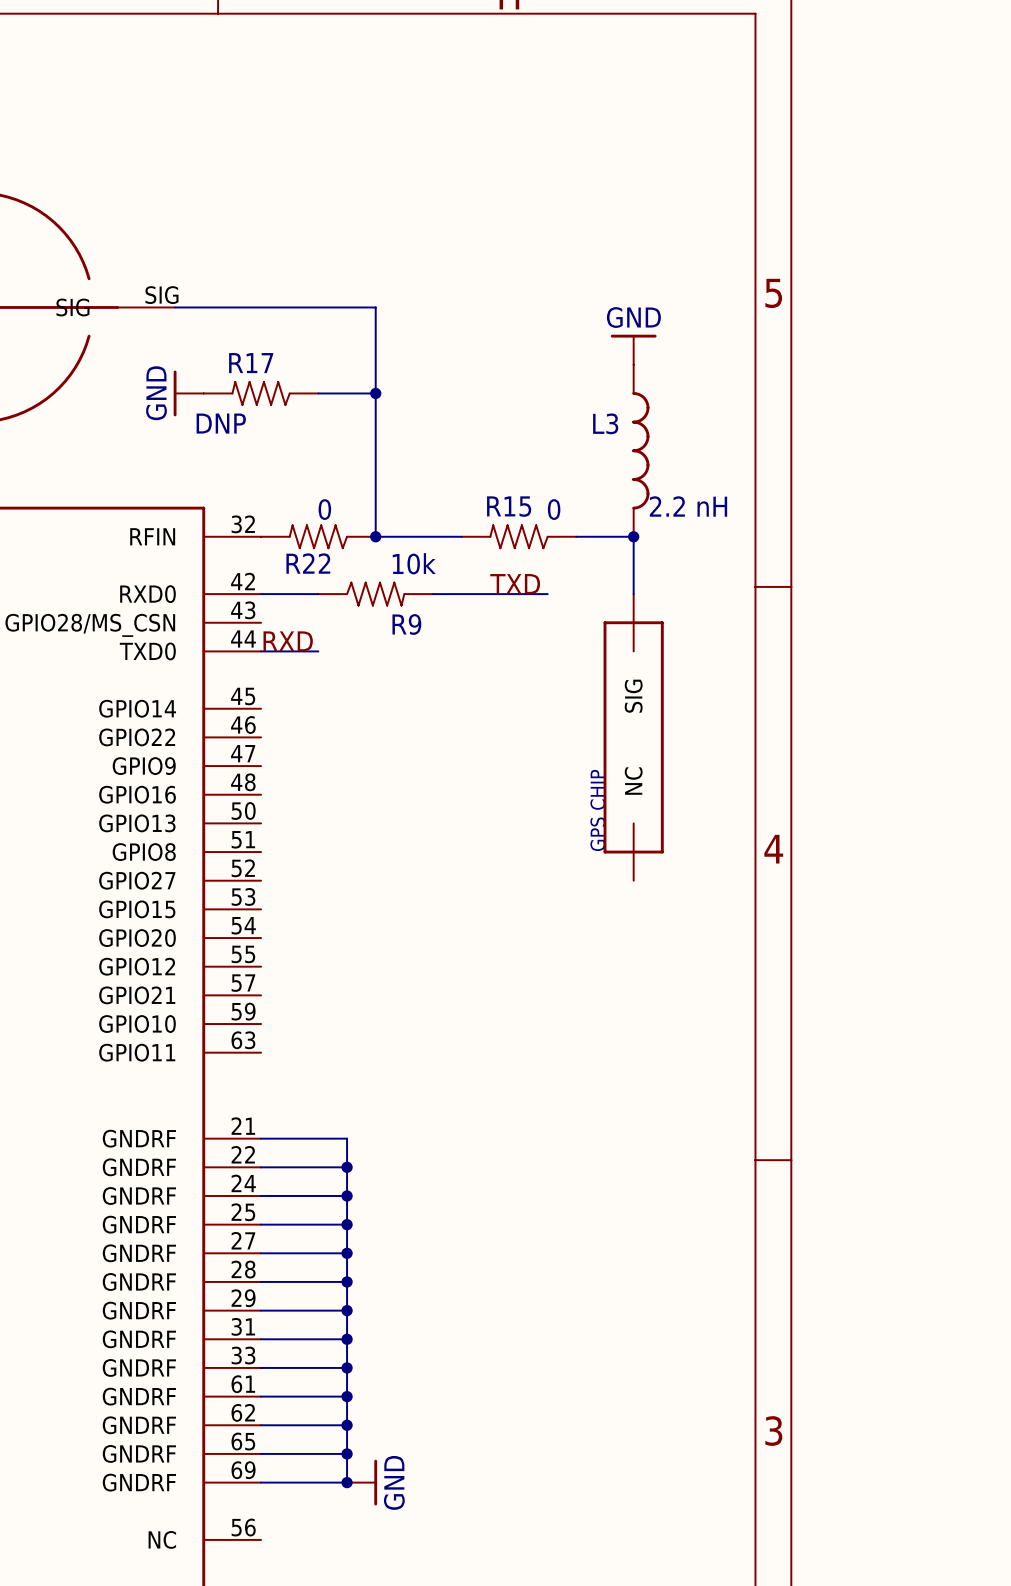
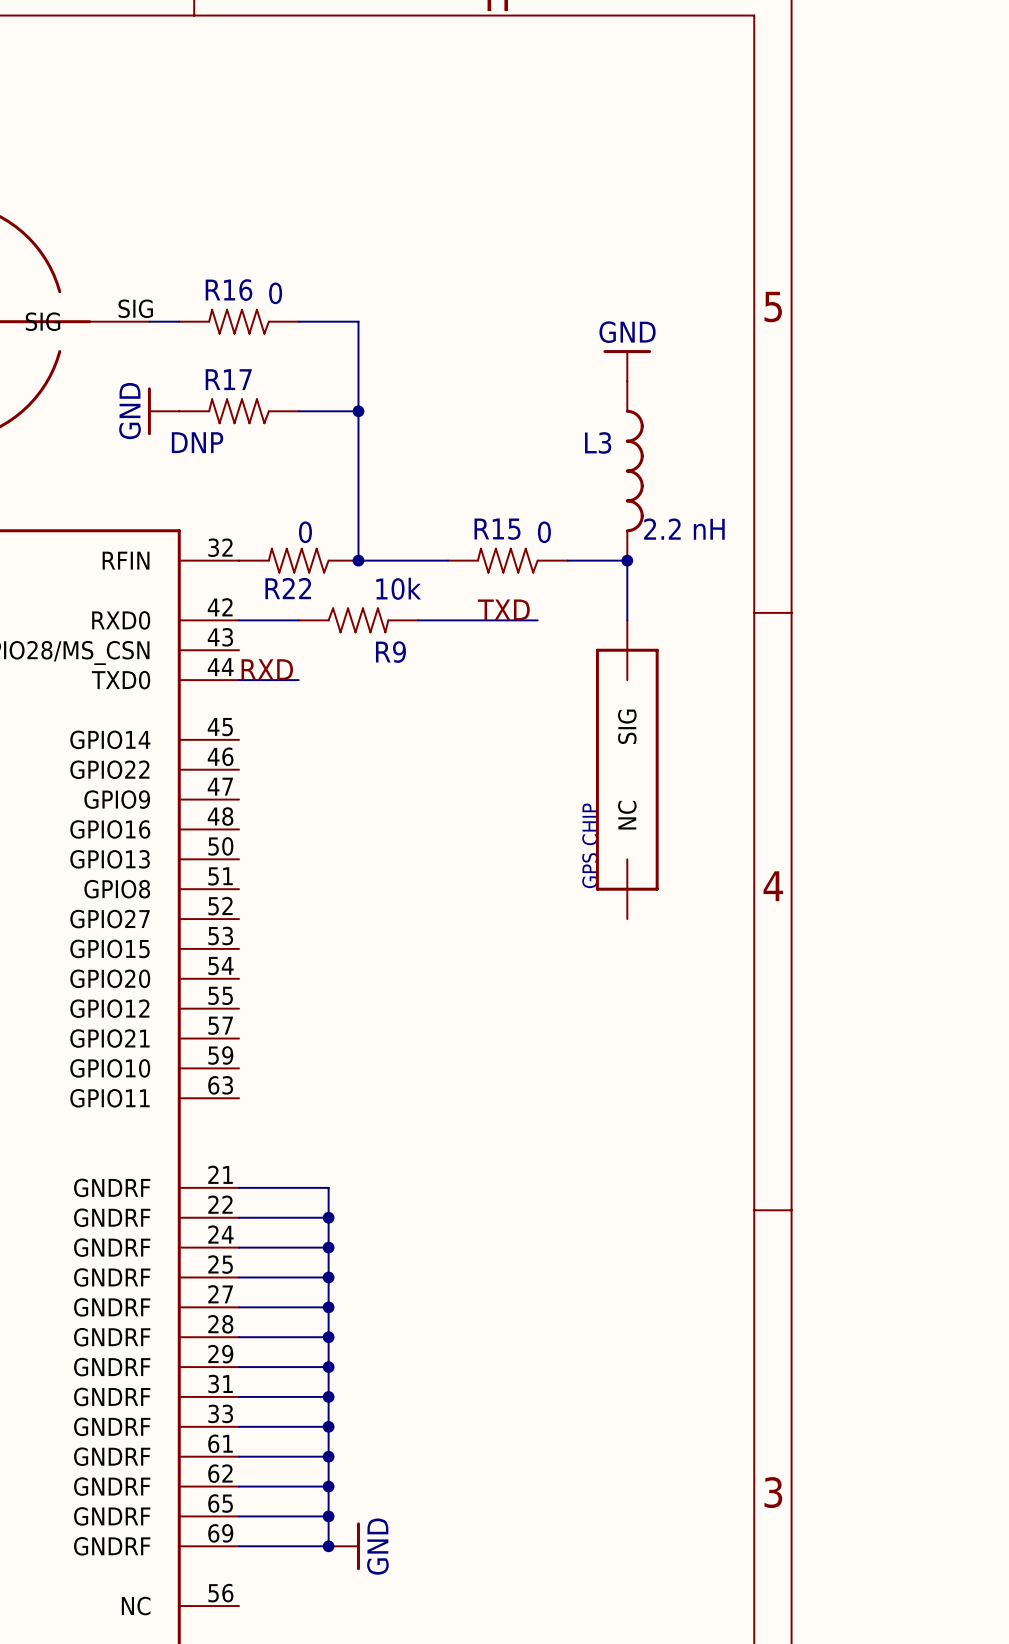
R16: none -> 0 (239, 321)

